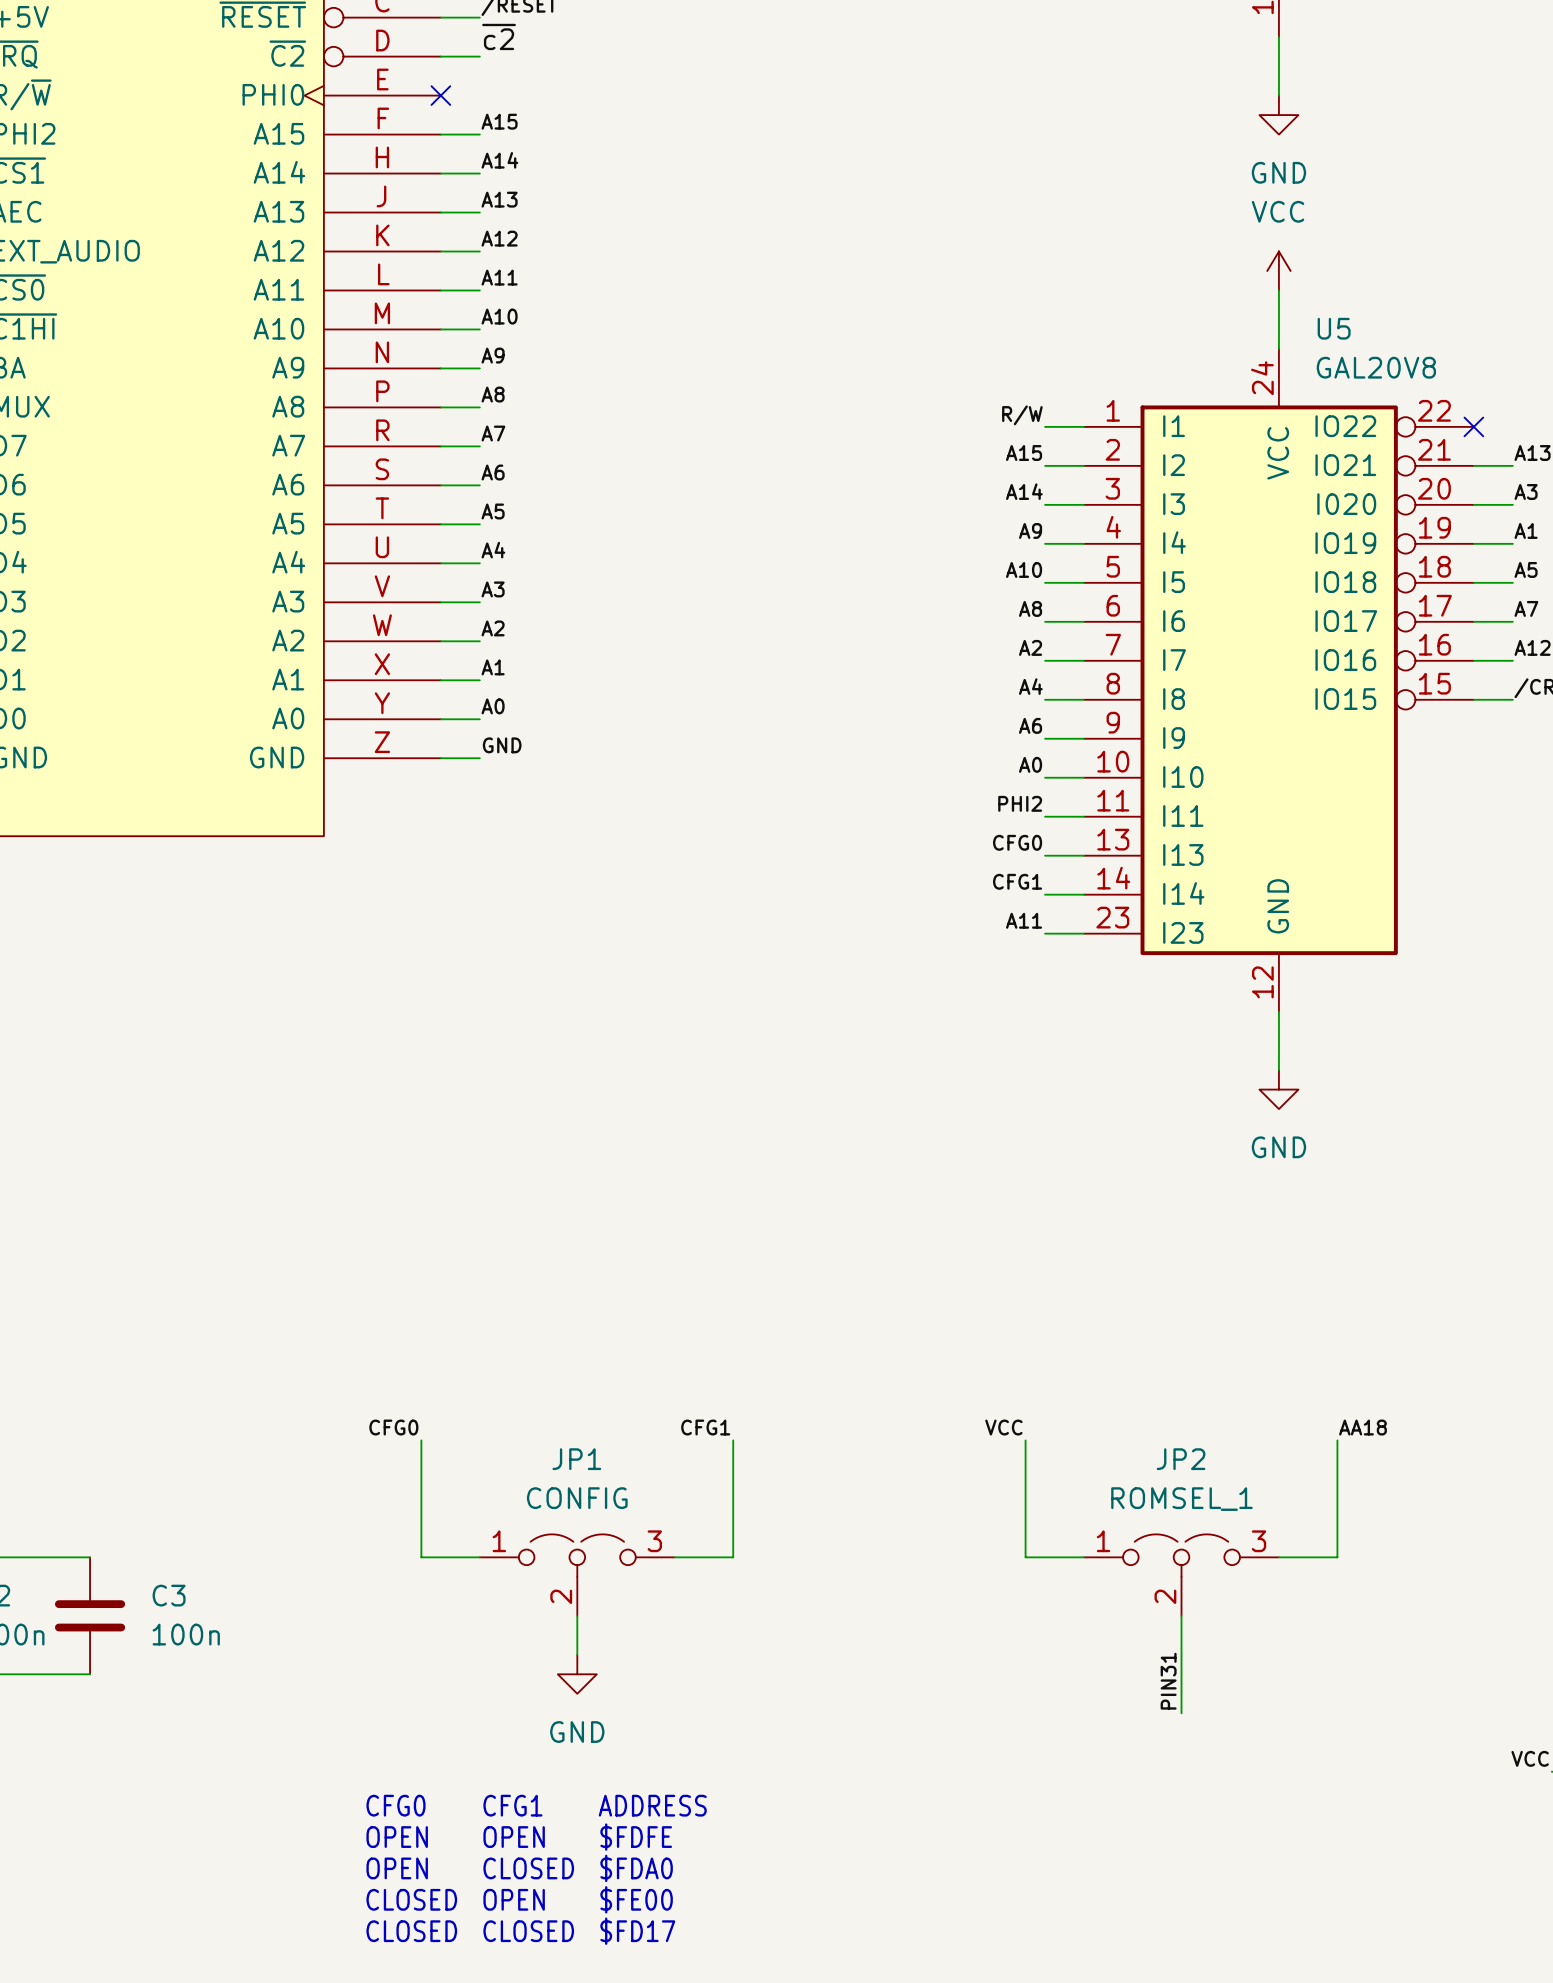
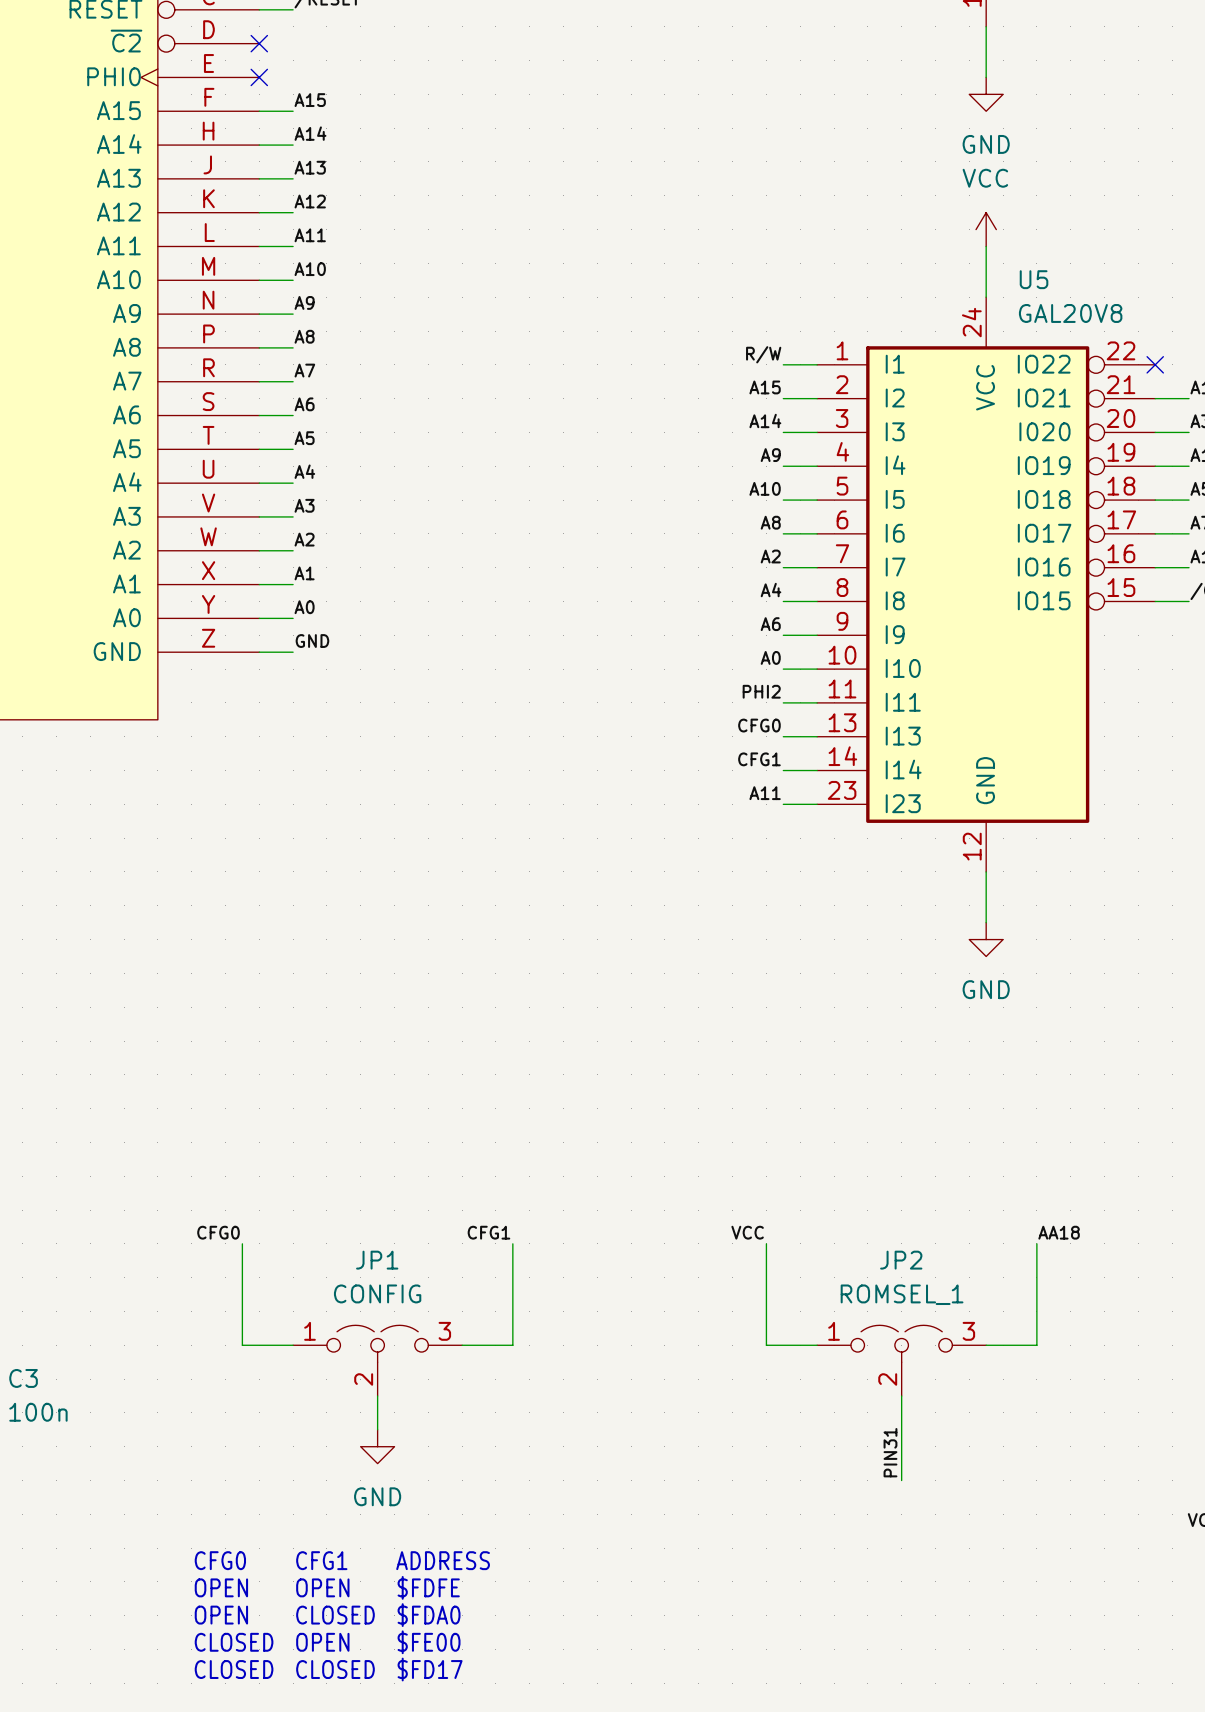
label: ~{c2} (499, 36) -> none
wire: (440, 56) (479, 56) -> none
no-connect mark: none -> (259, 43)

